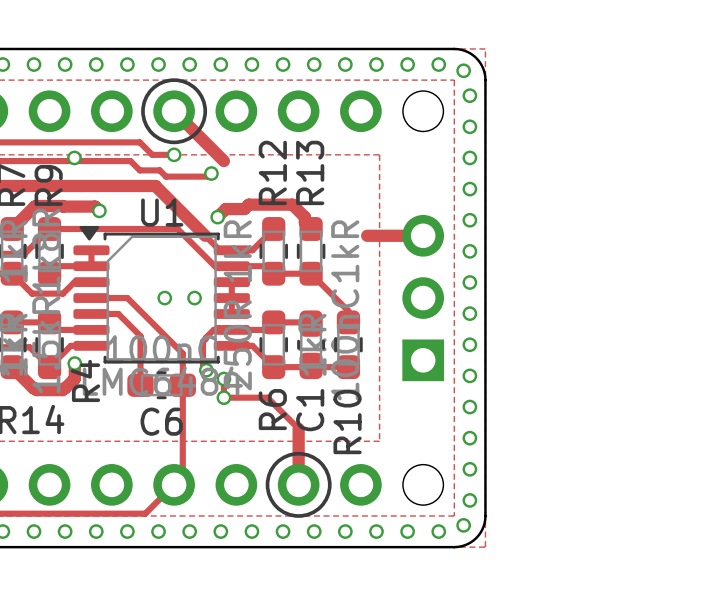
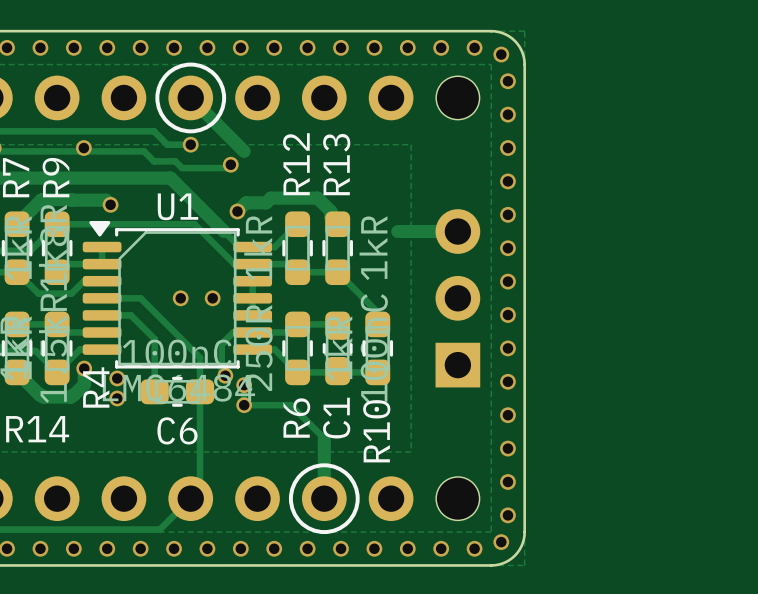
via: none -> (117, 378)
via: none -> (117, 398)

